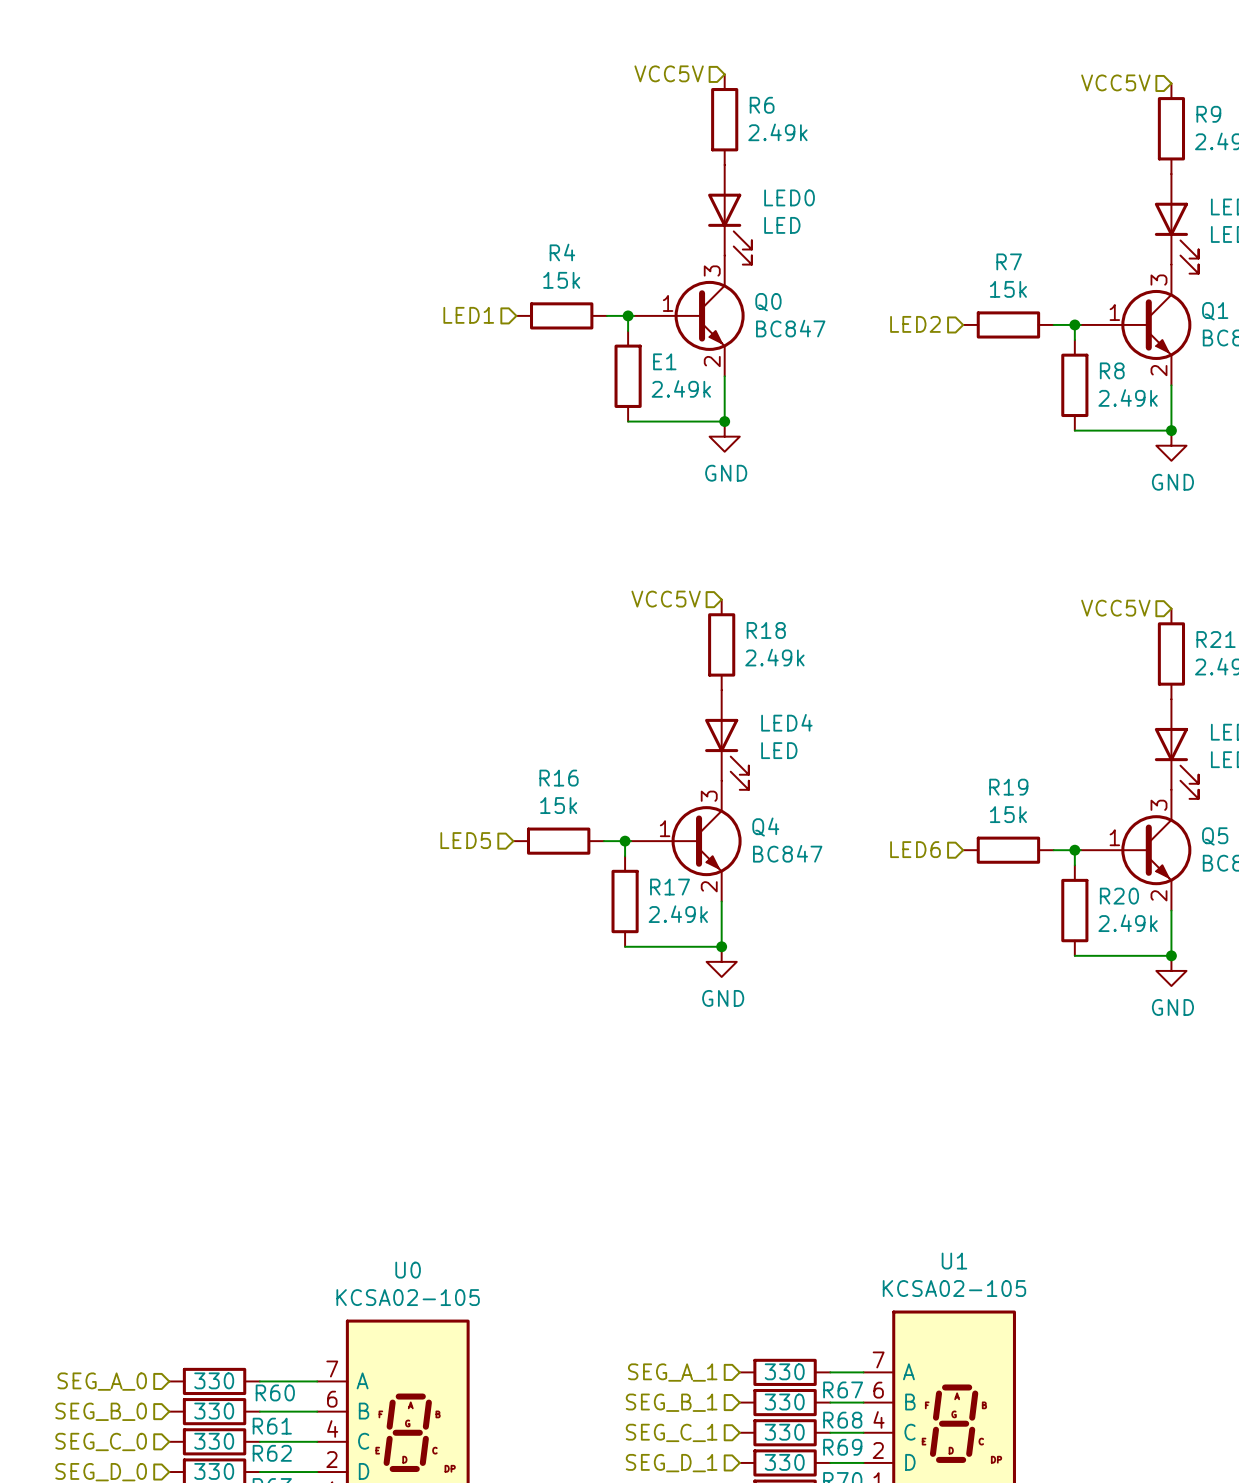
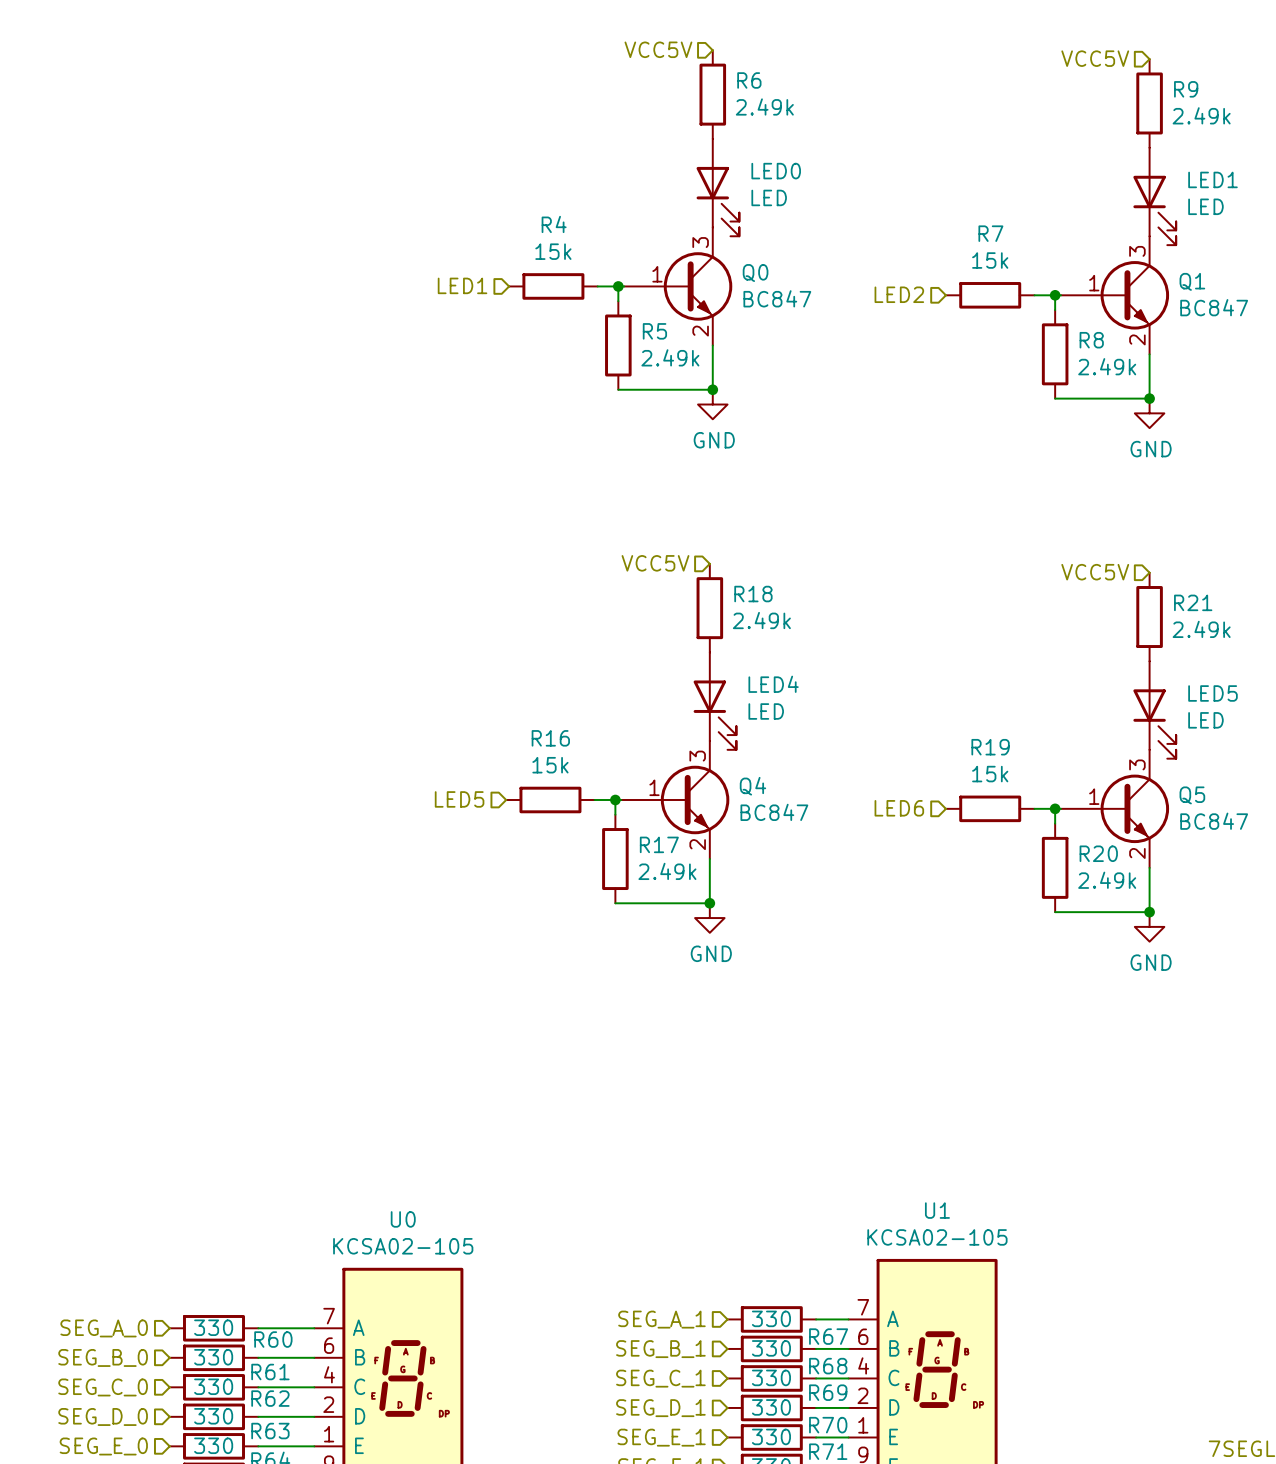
E1 name: E1 (664, 361) -> R5 (654, 331)

